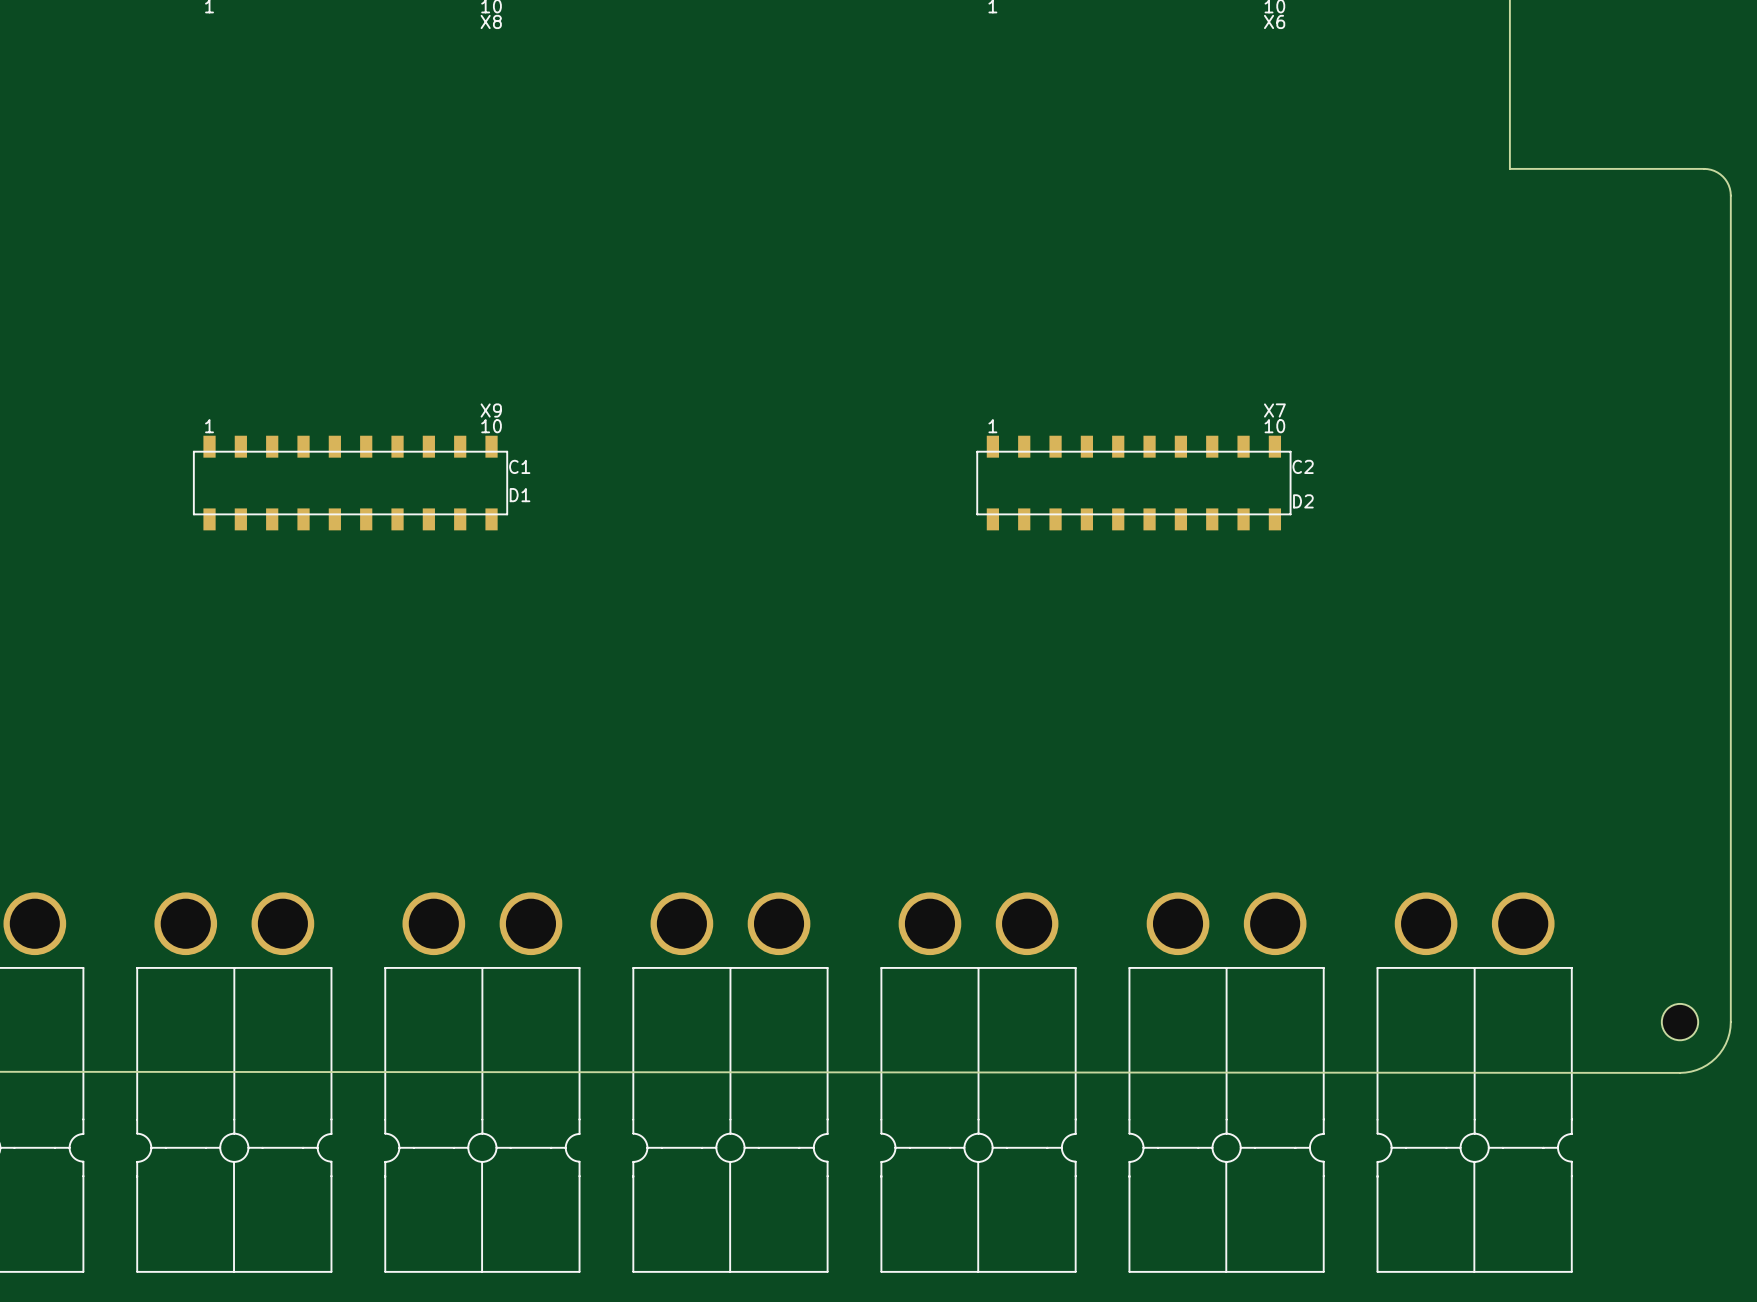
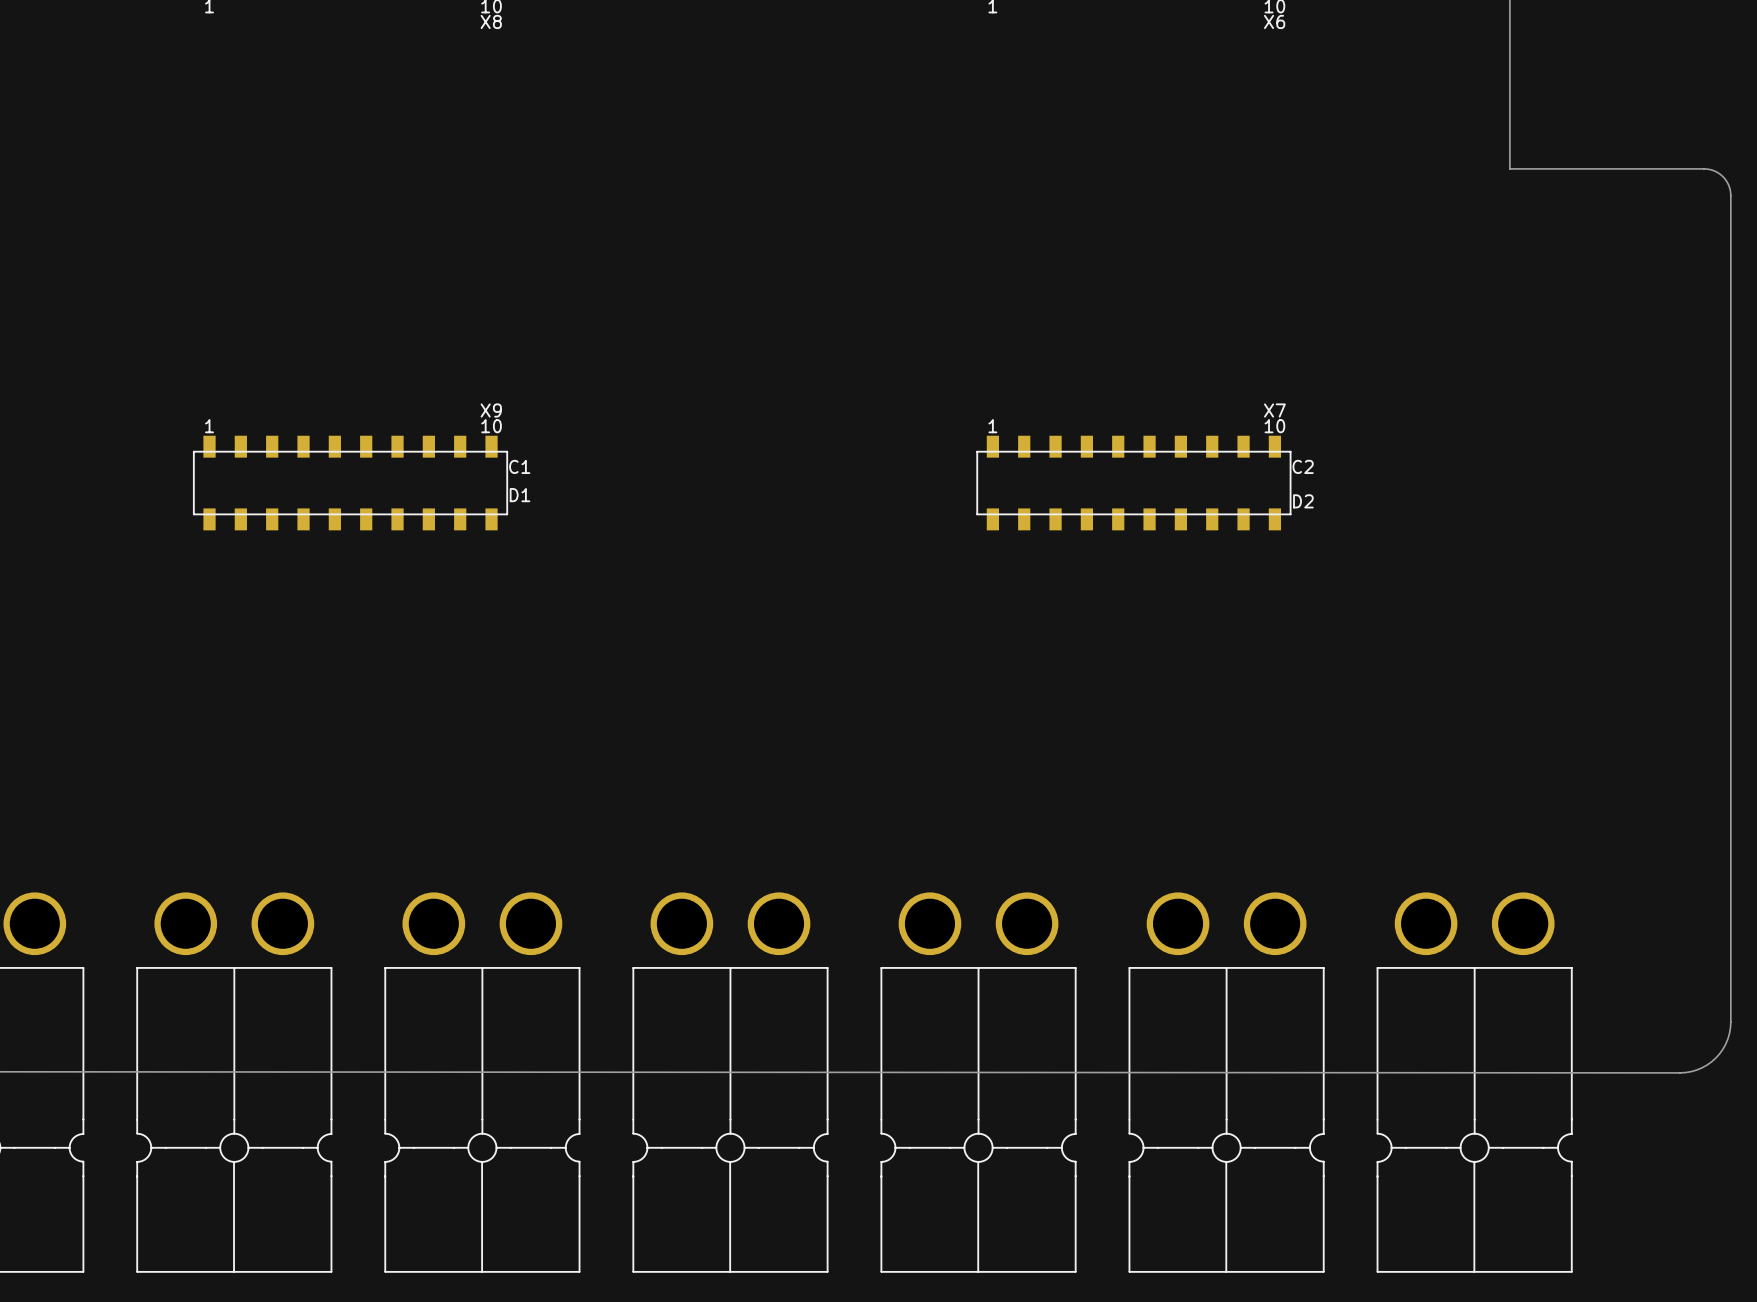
part: (1679, 1022) -> none

